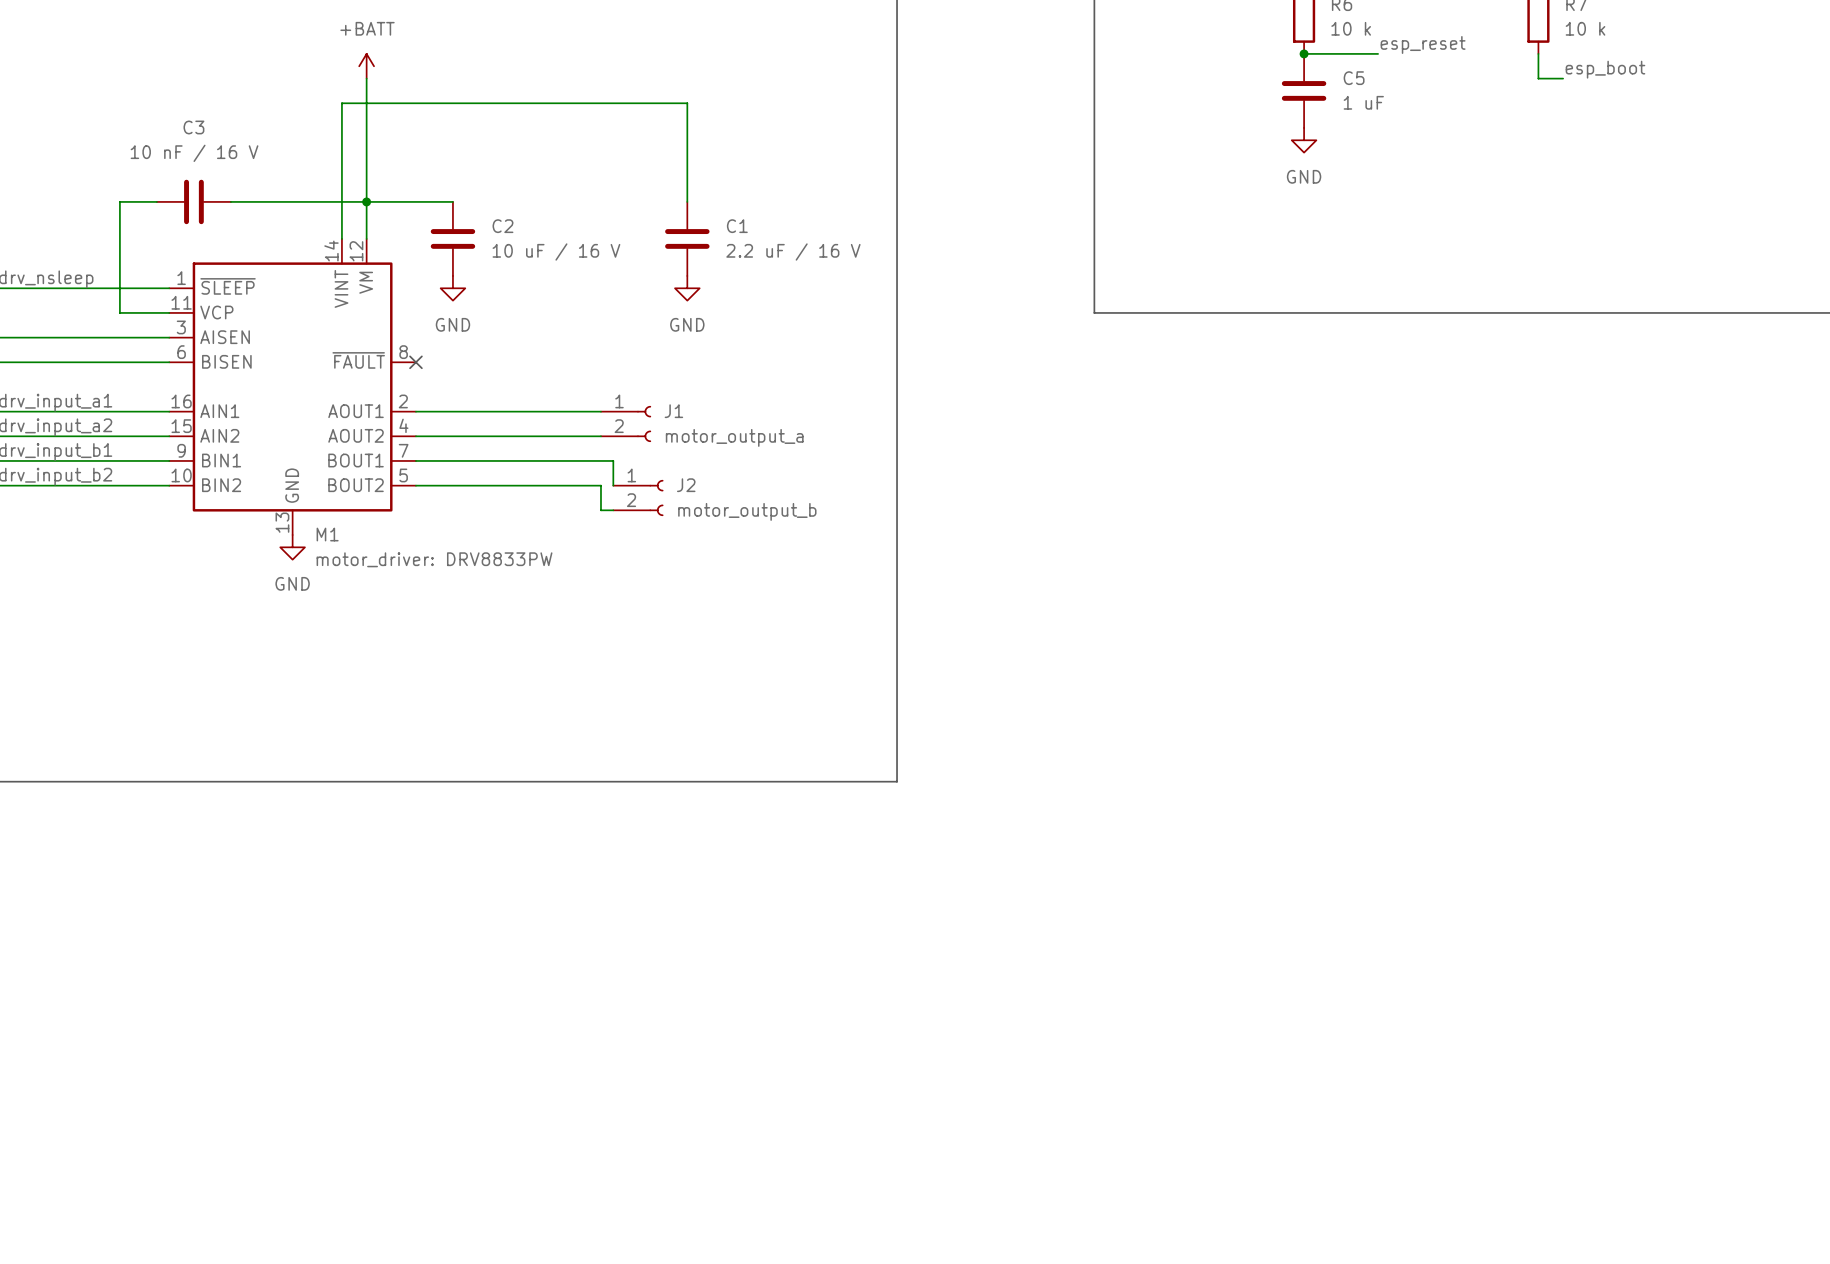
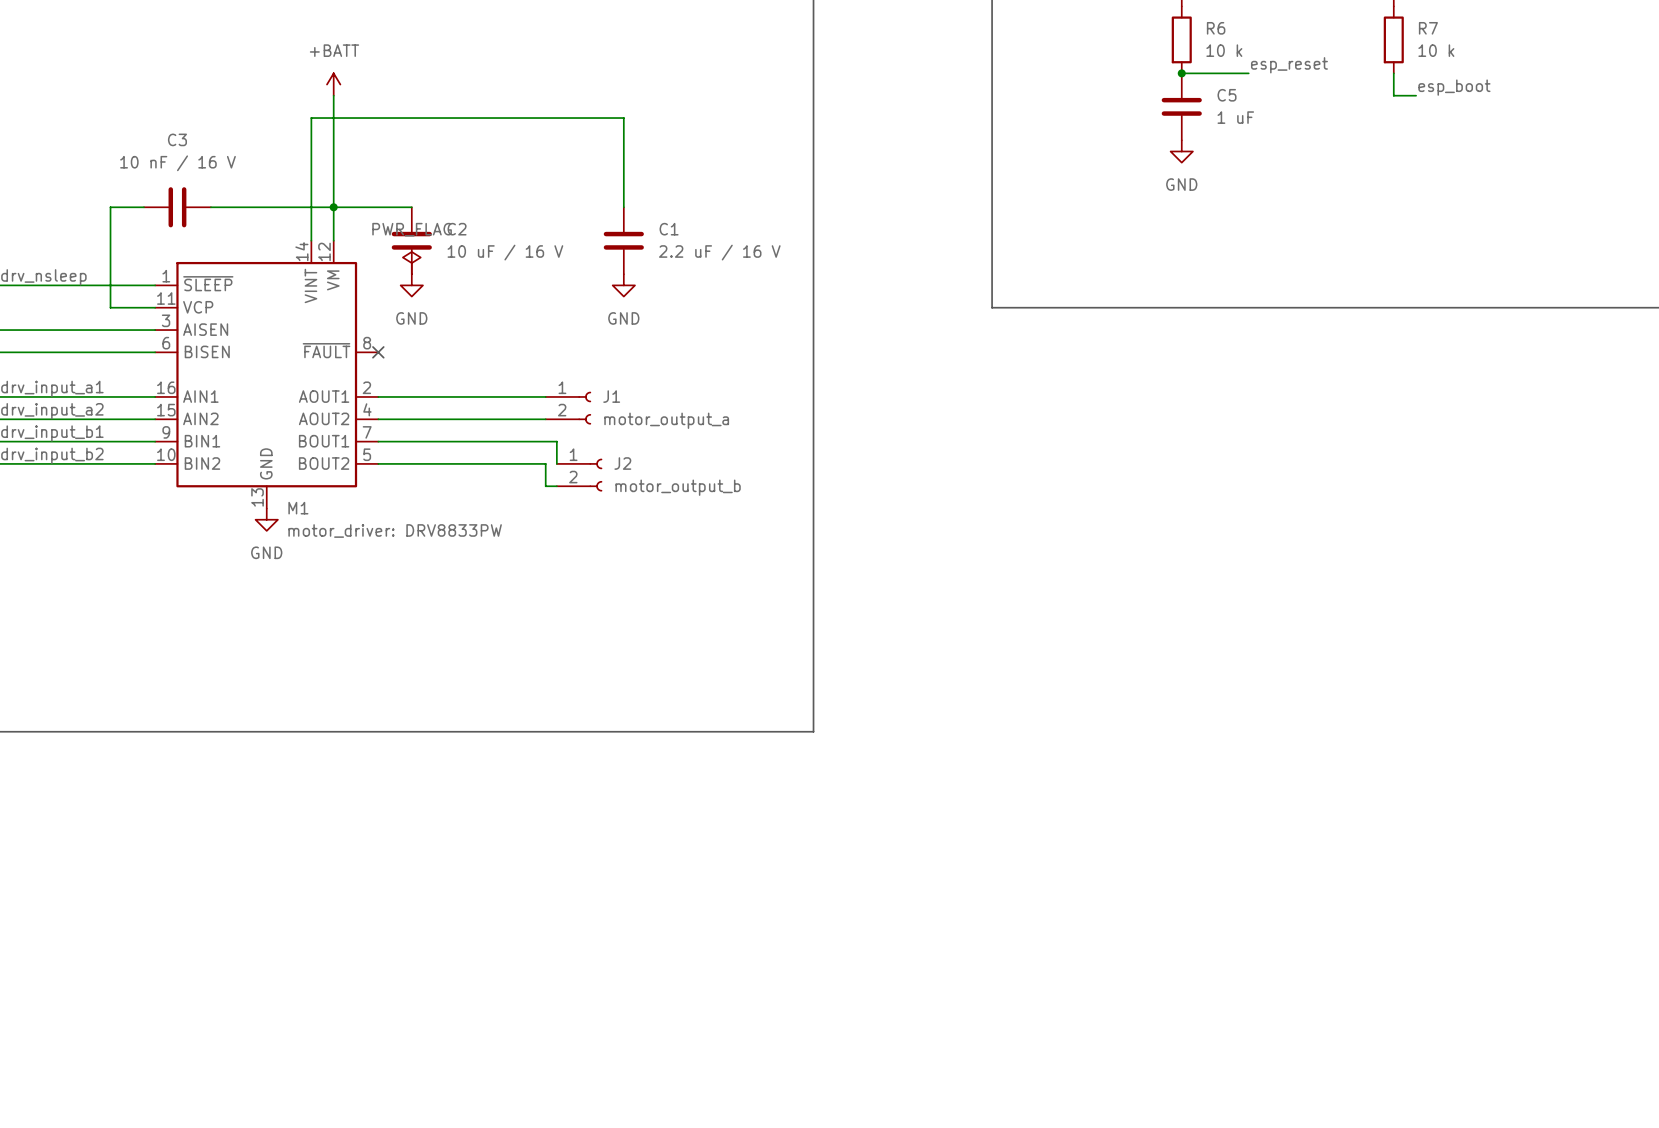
power symbol: none -> PWR_FLAG (411, 263)

